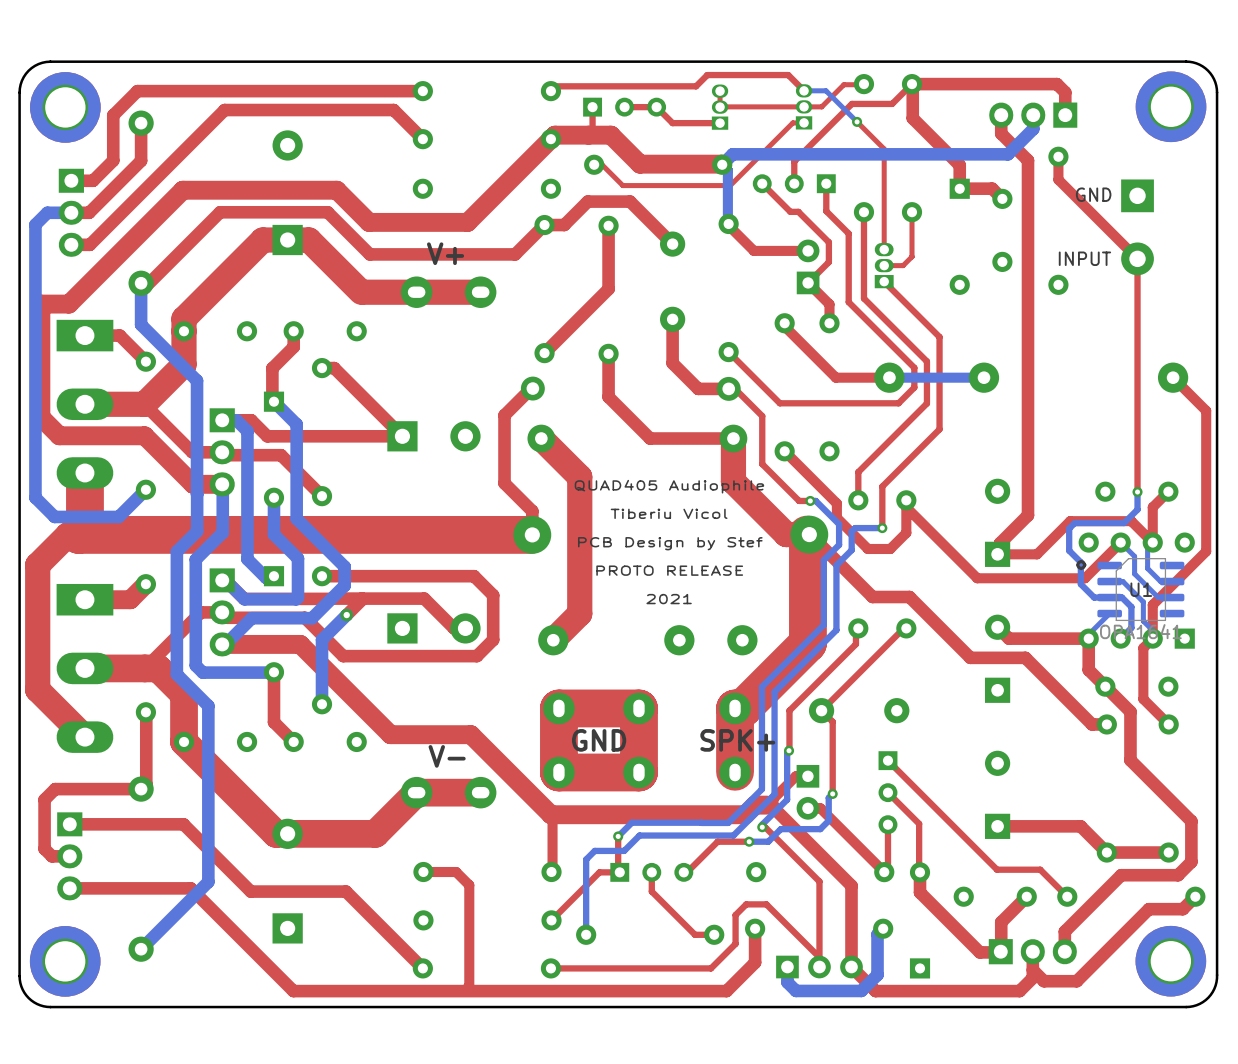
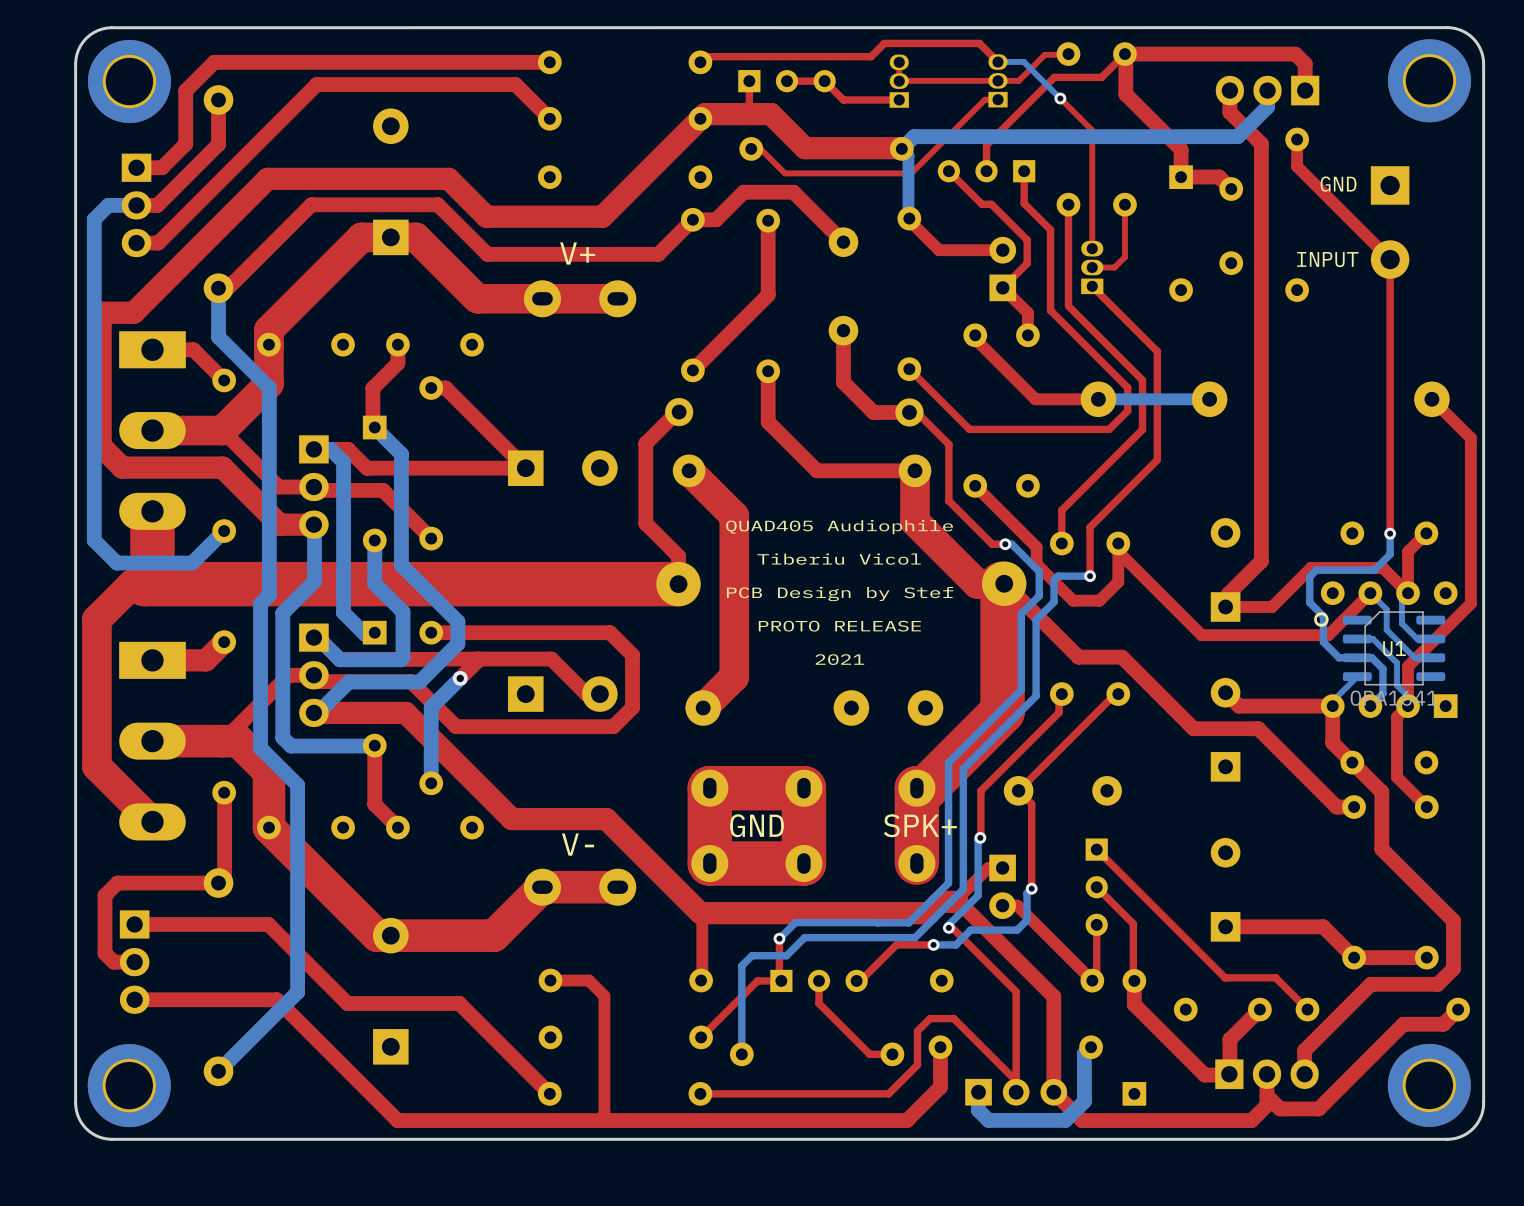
bottom track: (184, 368) (197, 380) (197, 494) -> (269, 387) (269, 595)
bottom track: (197, 494) (197, 531) (184, 544) -> none

